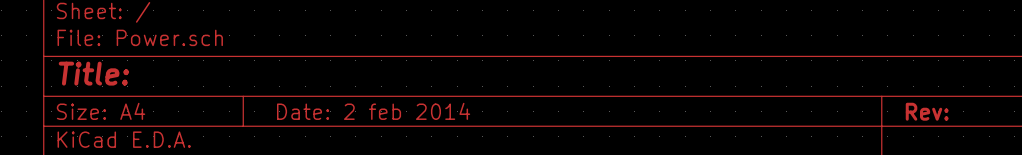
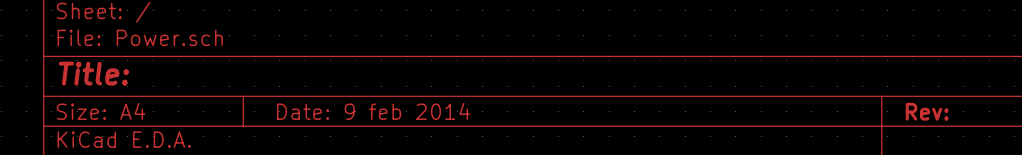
title block: Date: 2 feb 2014 (373, 111) -> Date: 9 feb 2014 (373, 111)

